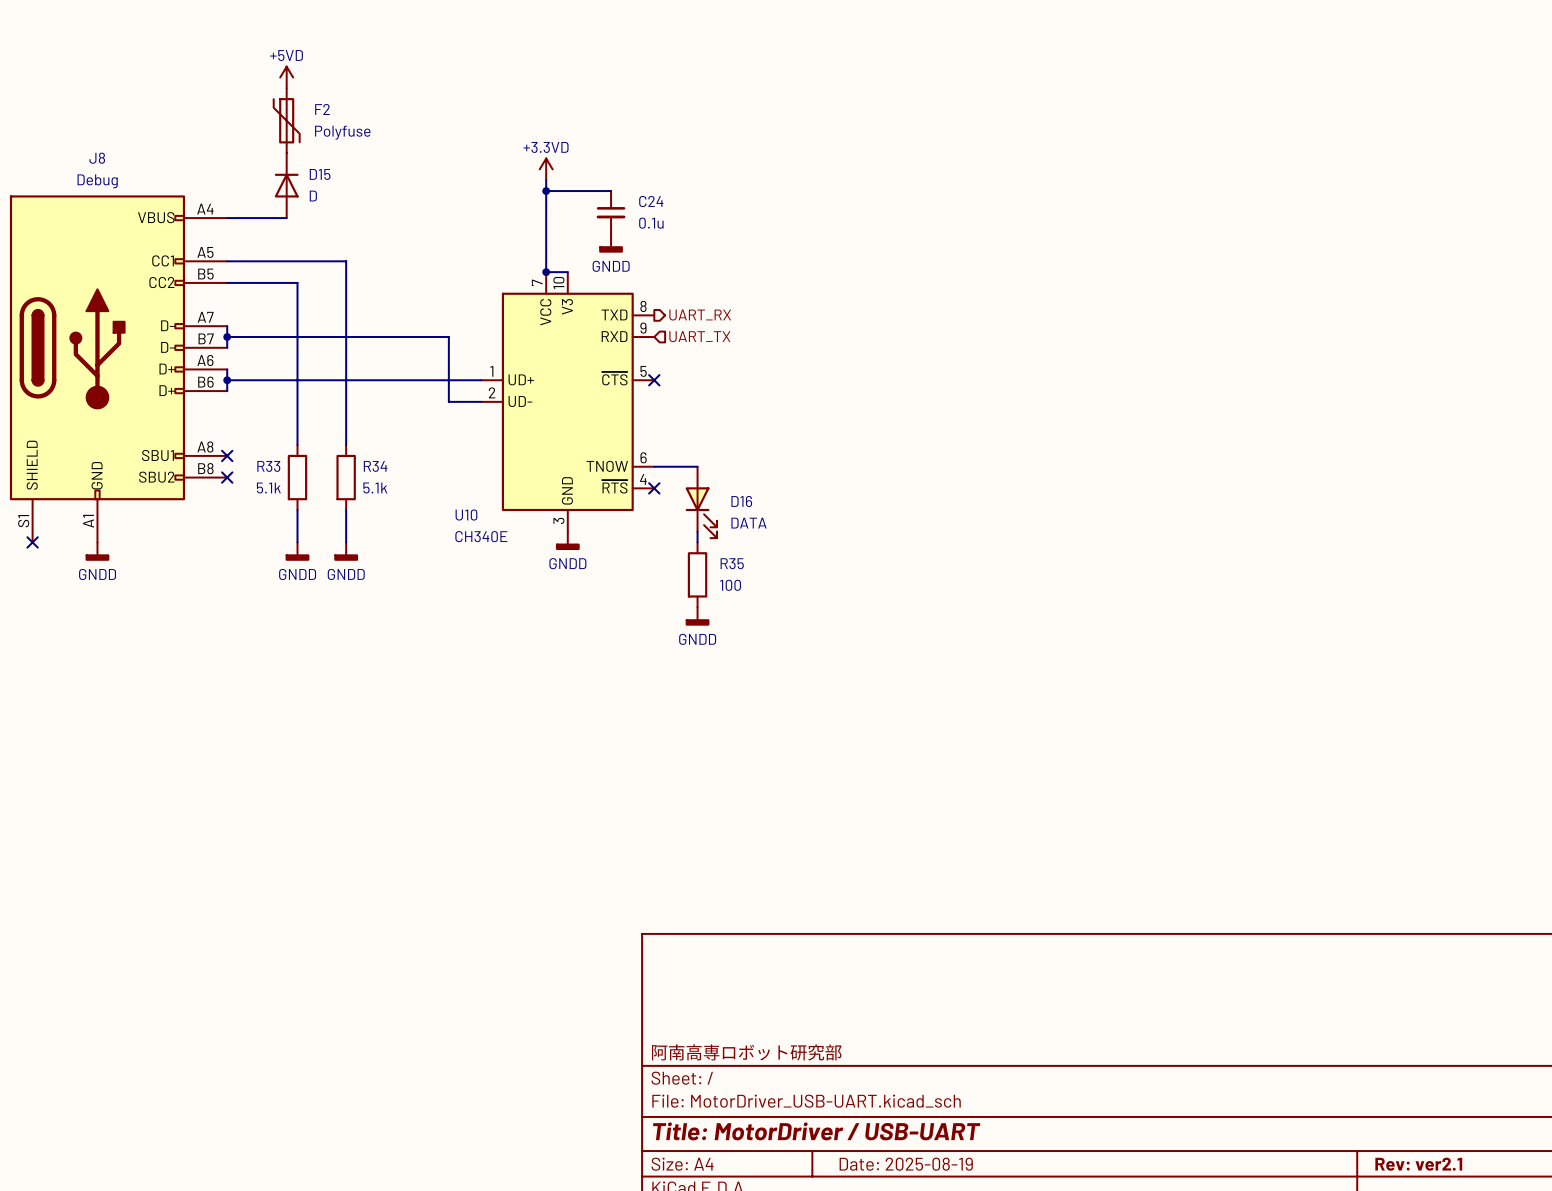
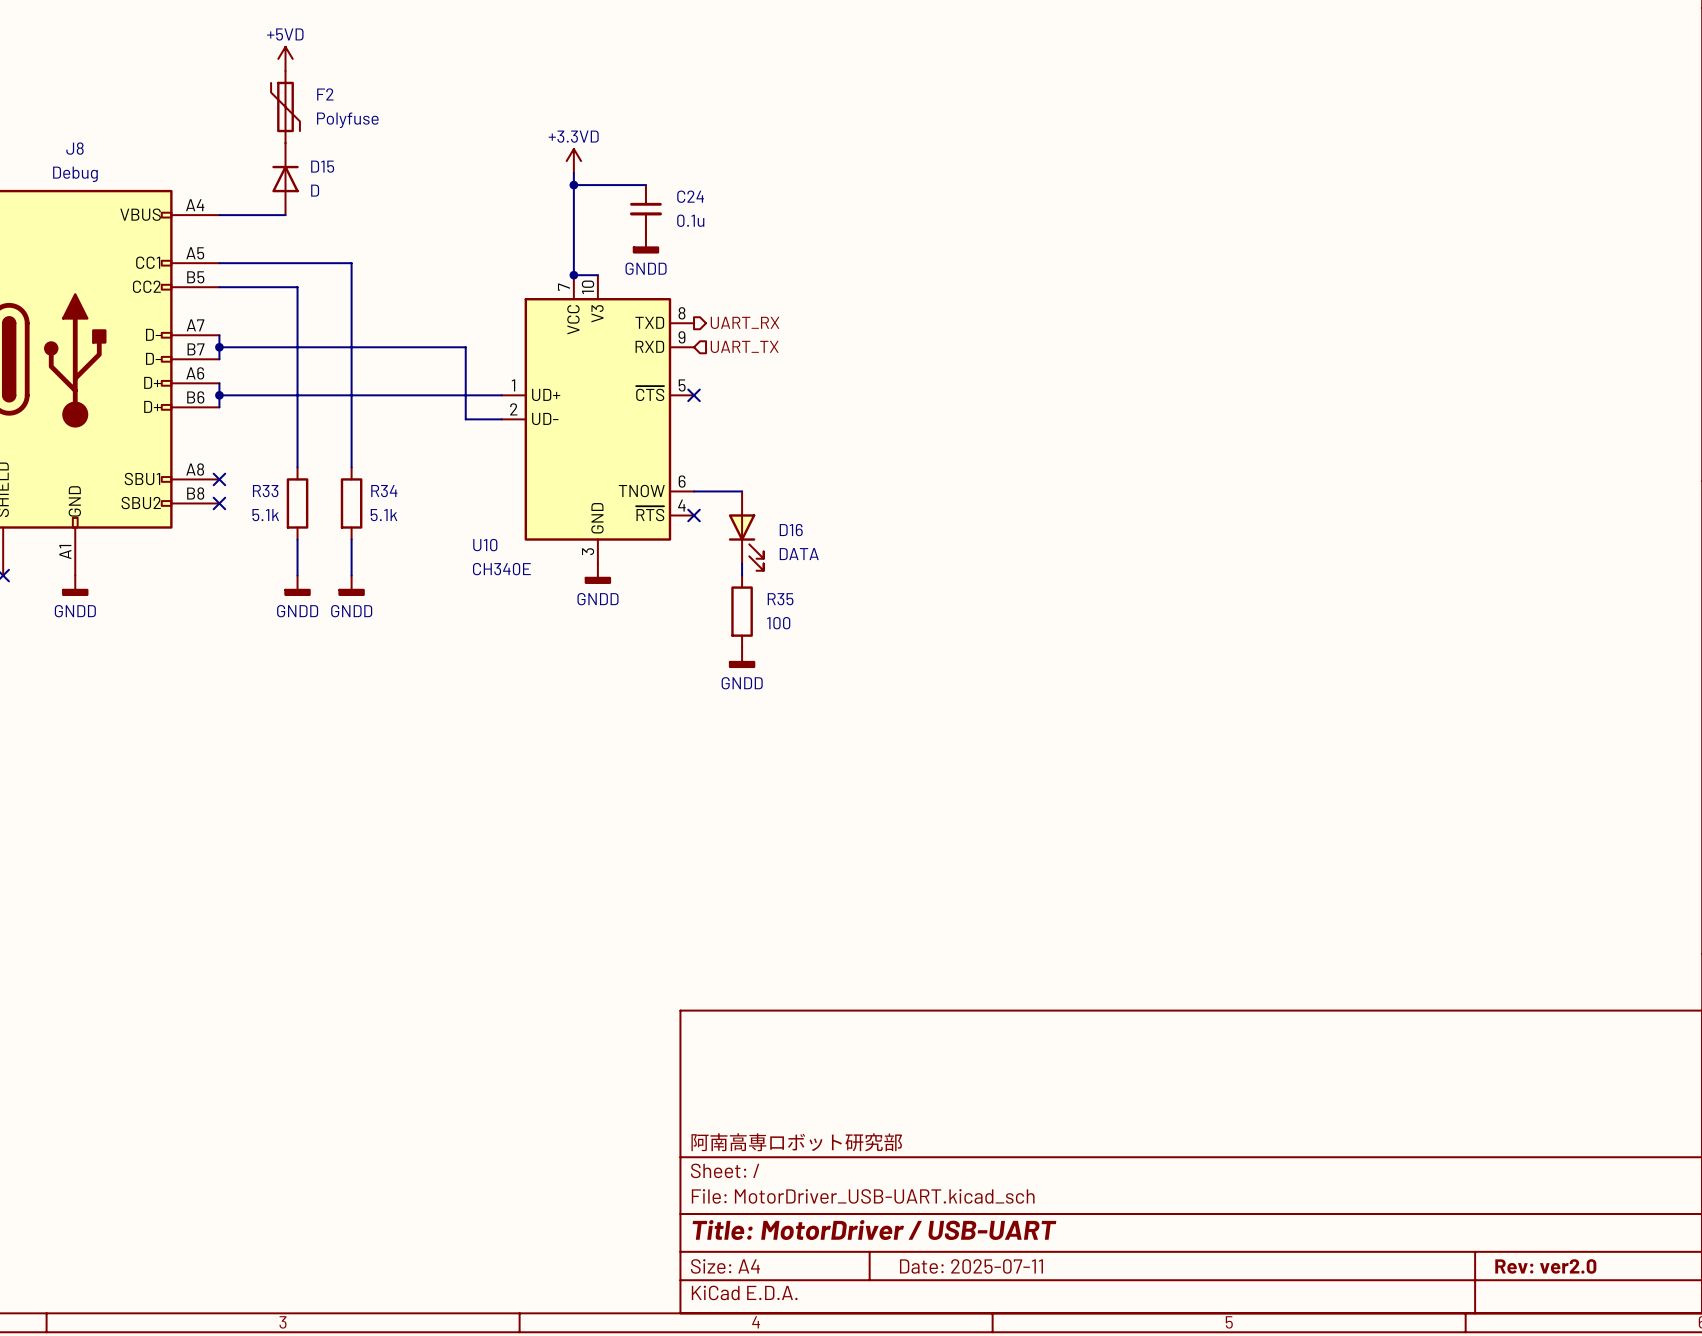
title block: Date: 2025-08-19 (906, 1164) -> Date: 2025-07-11 (971, 1266)
title block: Rev: ver2.1 (1418, 1164) -> Rev: ver2.0 (1545, 1266)

